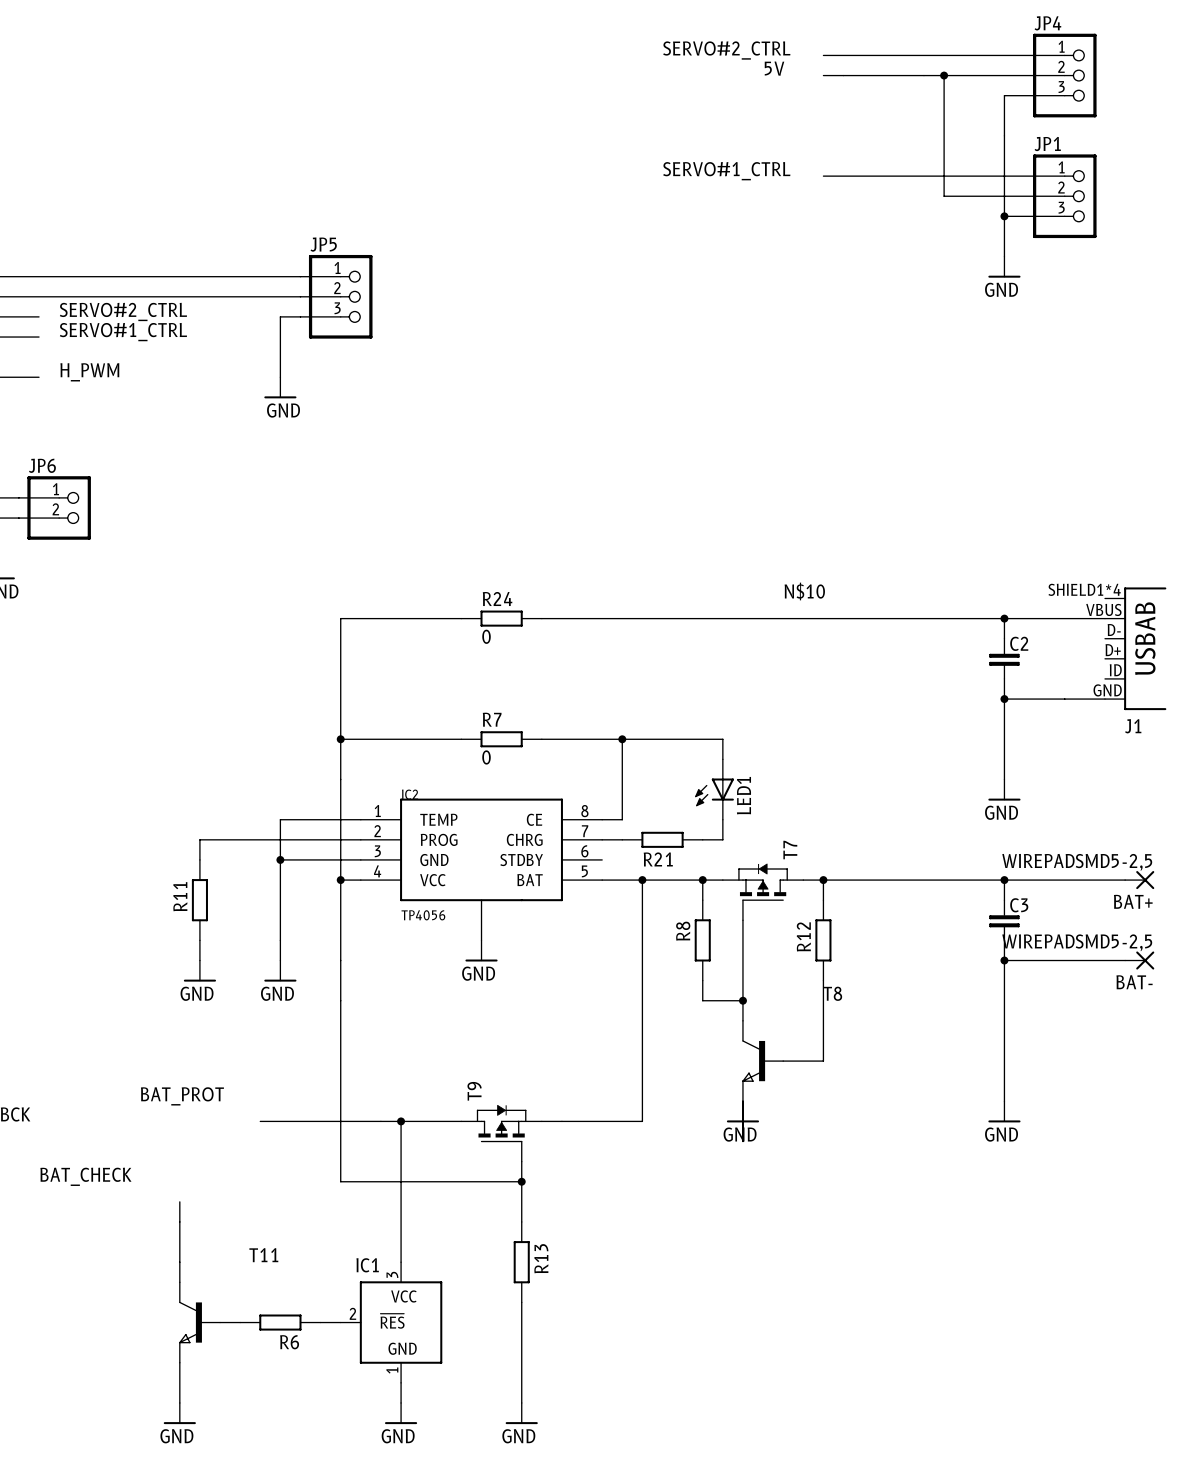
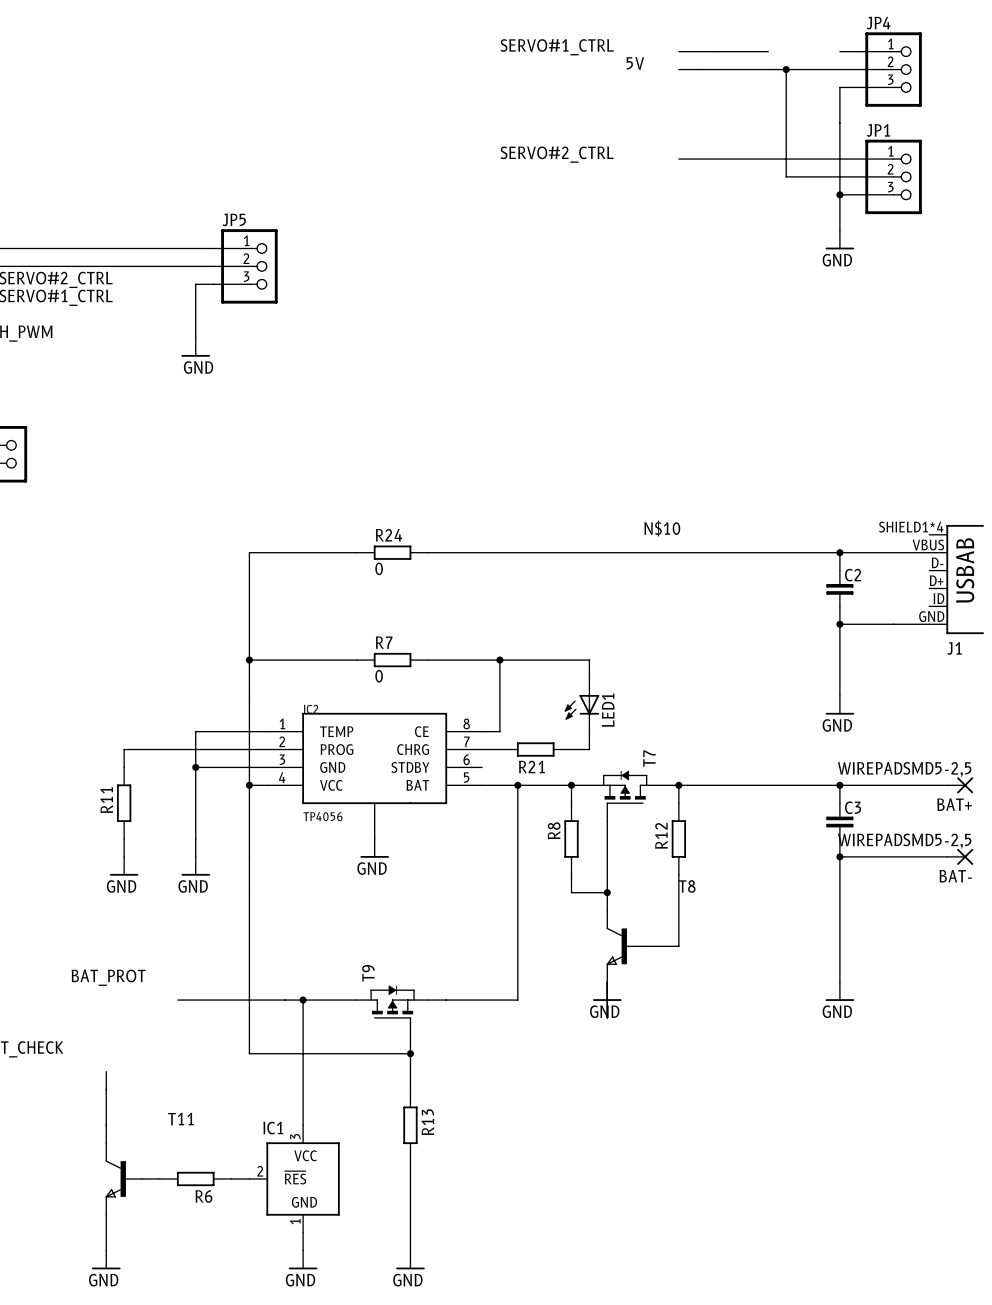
label position: SERVO#2_CTRL (726, 50) -> SERVO#2_CTRL (557, 154)
wire: (923, 55) (1004, 55) -> none
label position: SERVO#1_CTRL (726, 171) -> SERVO#1_CTRL (557, 47)

